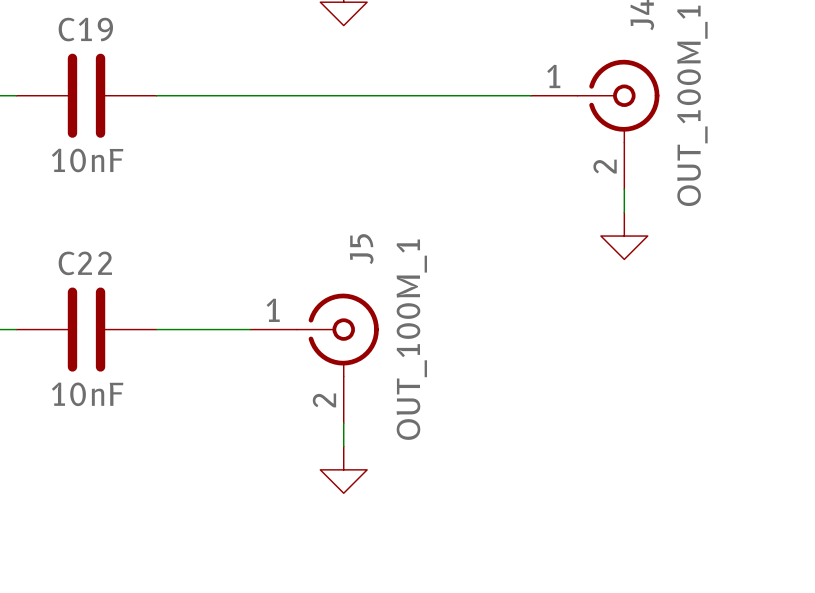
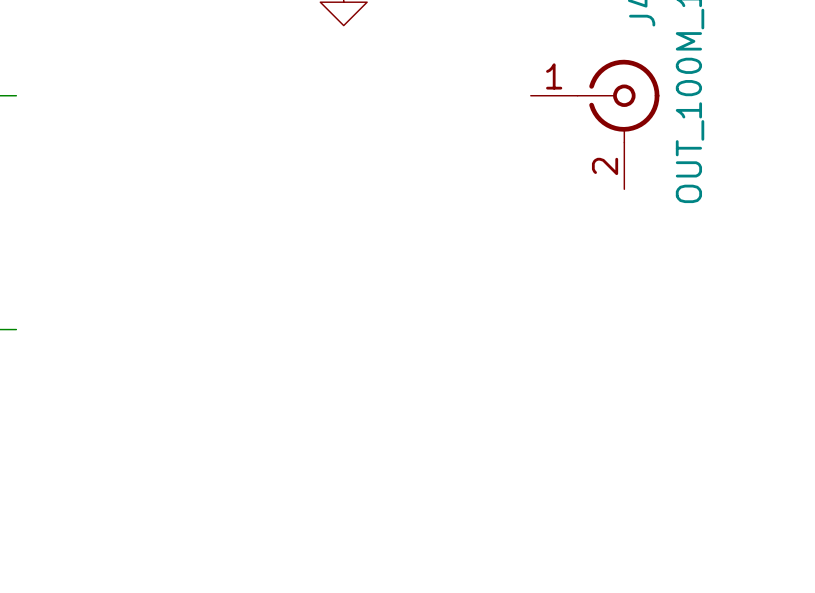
C19: 10nF (86, 95) -> none
wire: (156, 95) (530, 95) -> none
wire: (624, 189) (624, 212) -> none
power symbol: (624, 236) -> none
C22: 10nF (86, 329) -> none
wire: (156, 329) (250, 329) -> none
J5: OUT_100M_1 (314, 358) -> none
wire: (343, 423) (343, 446) -> none
power symbol: (343, 469) -> none

